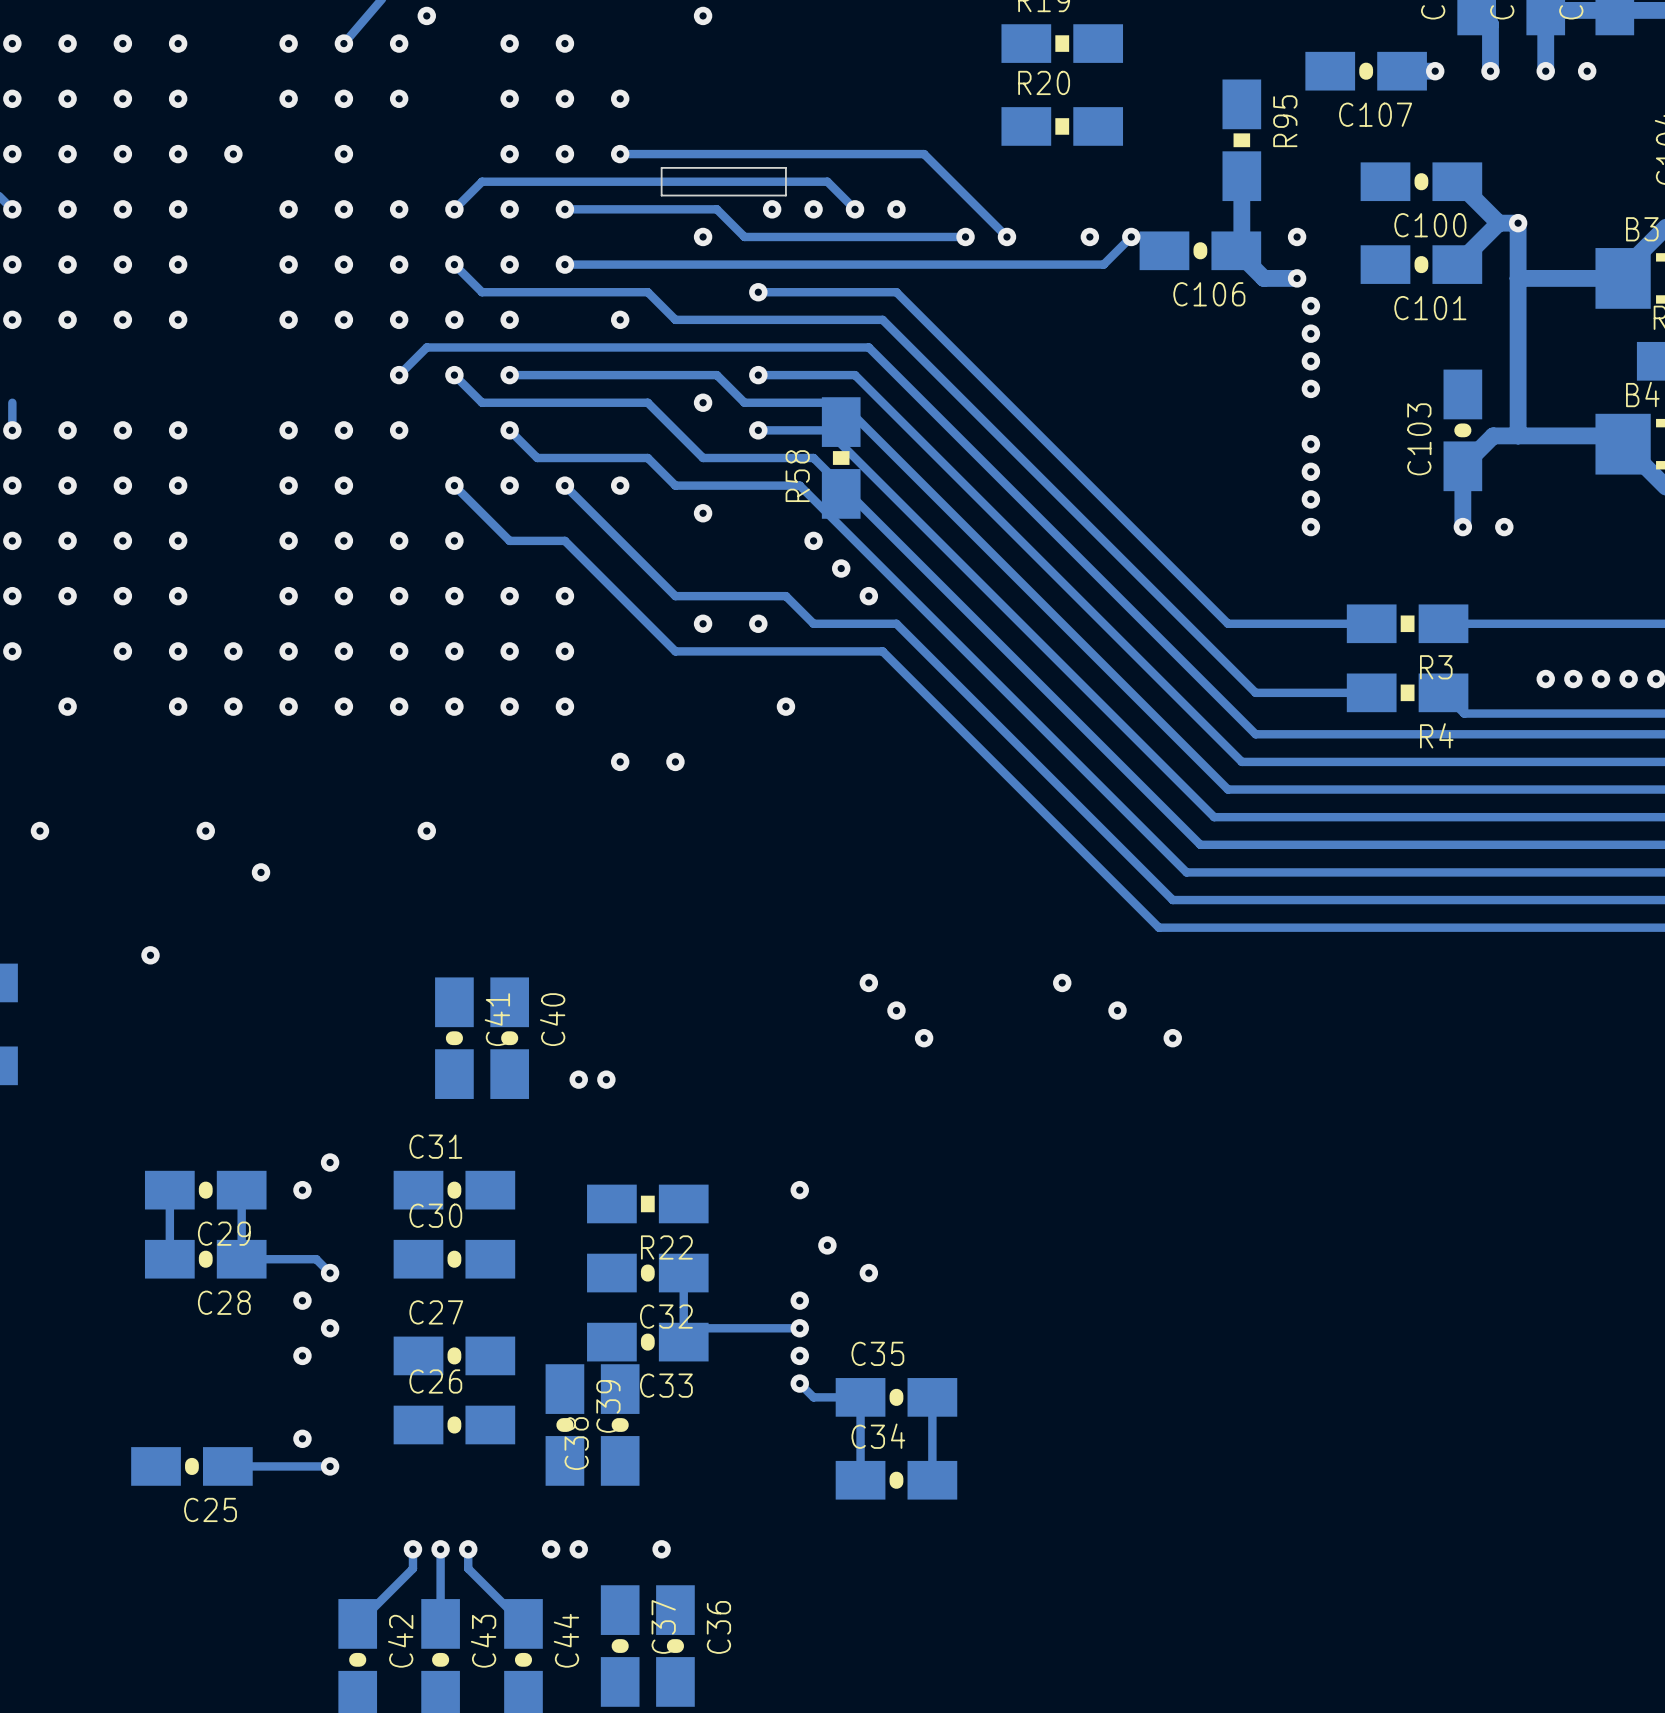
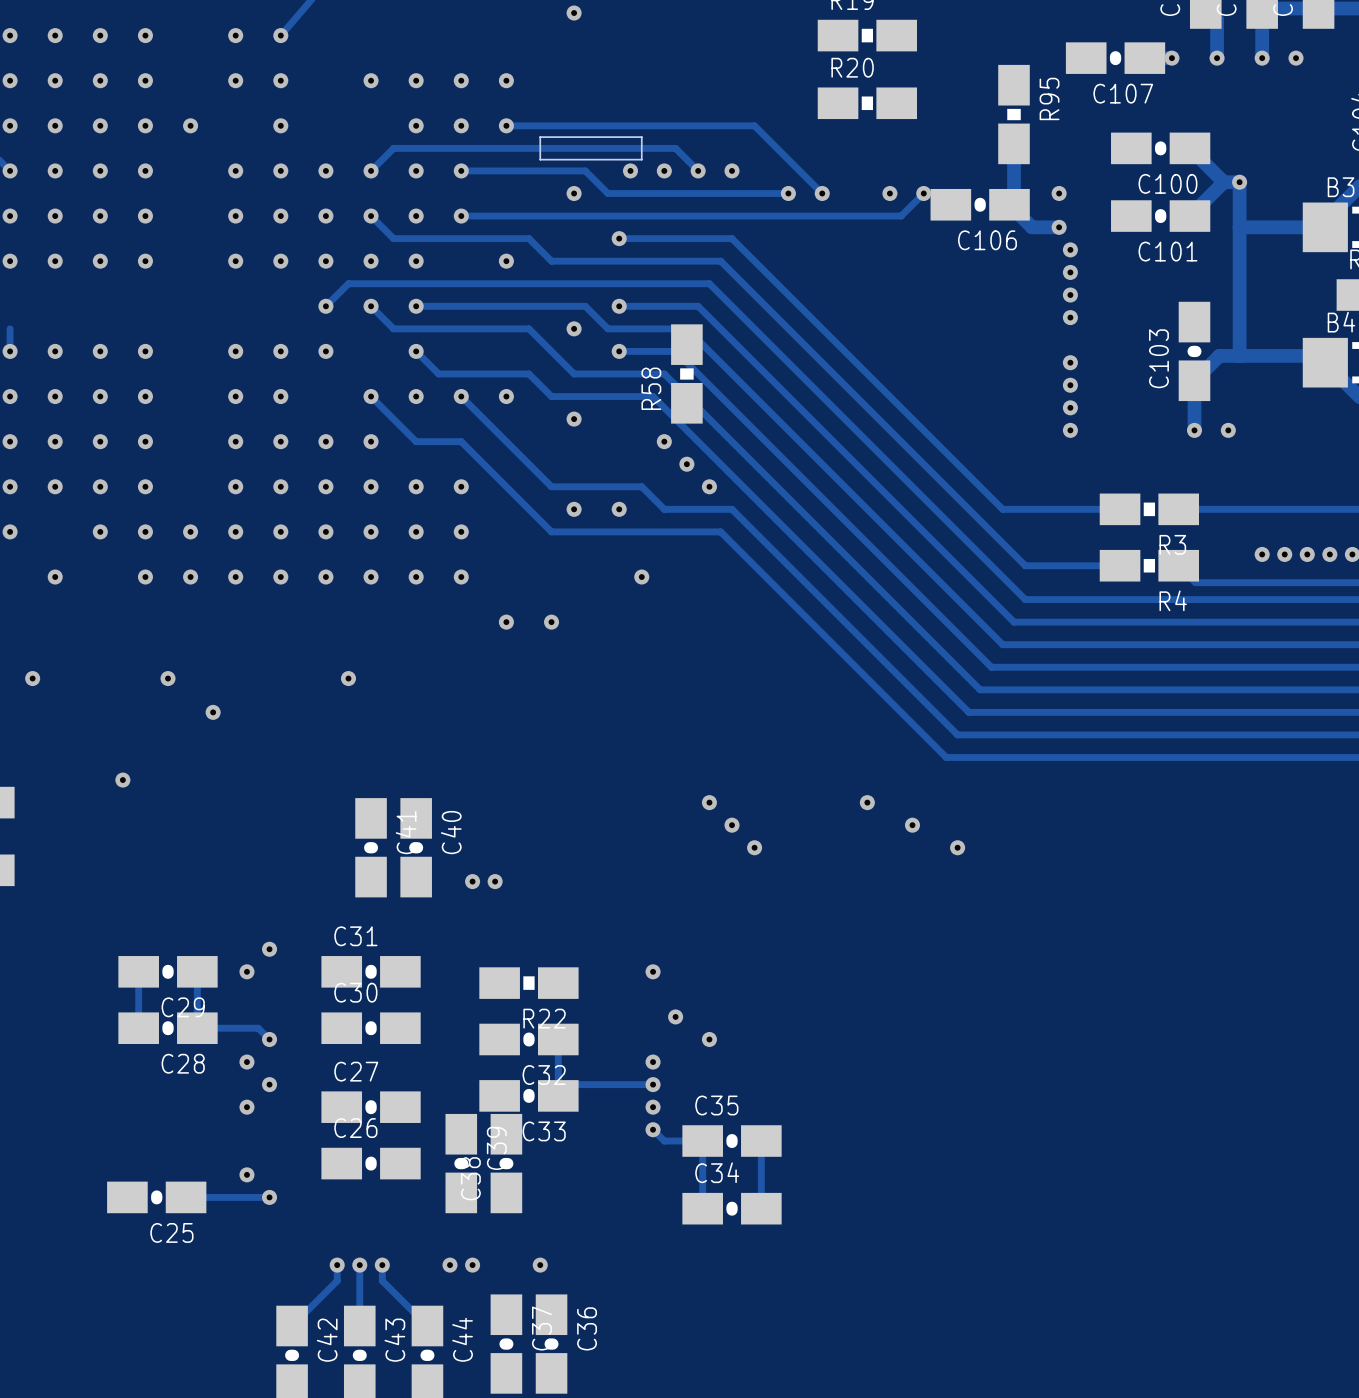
via: (426, 15) -> none
via: (399, 43) -> none
via: (509, 43) -> none
via: (564, 43) -> none
via: (399, 98) -> none
via: none -> (371, 80)

